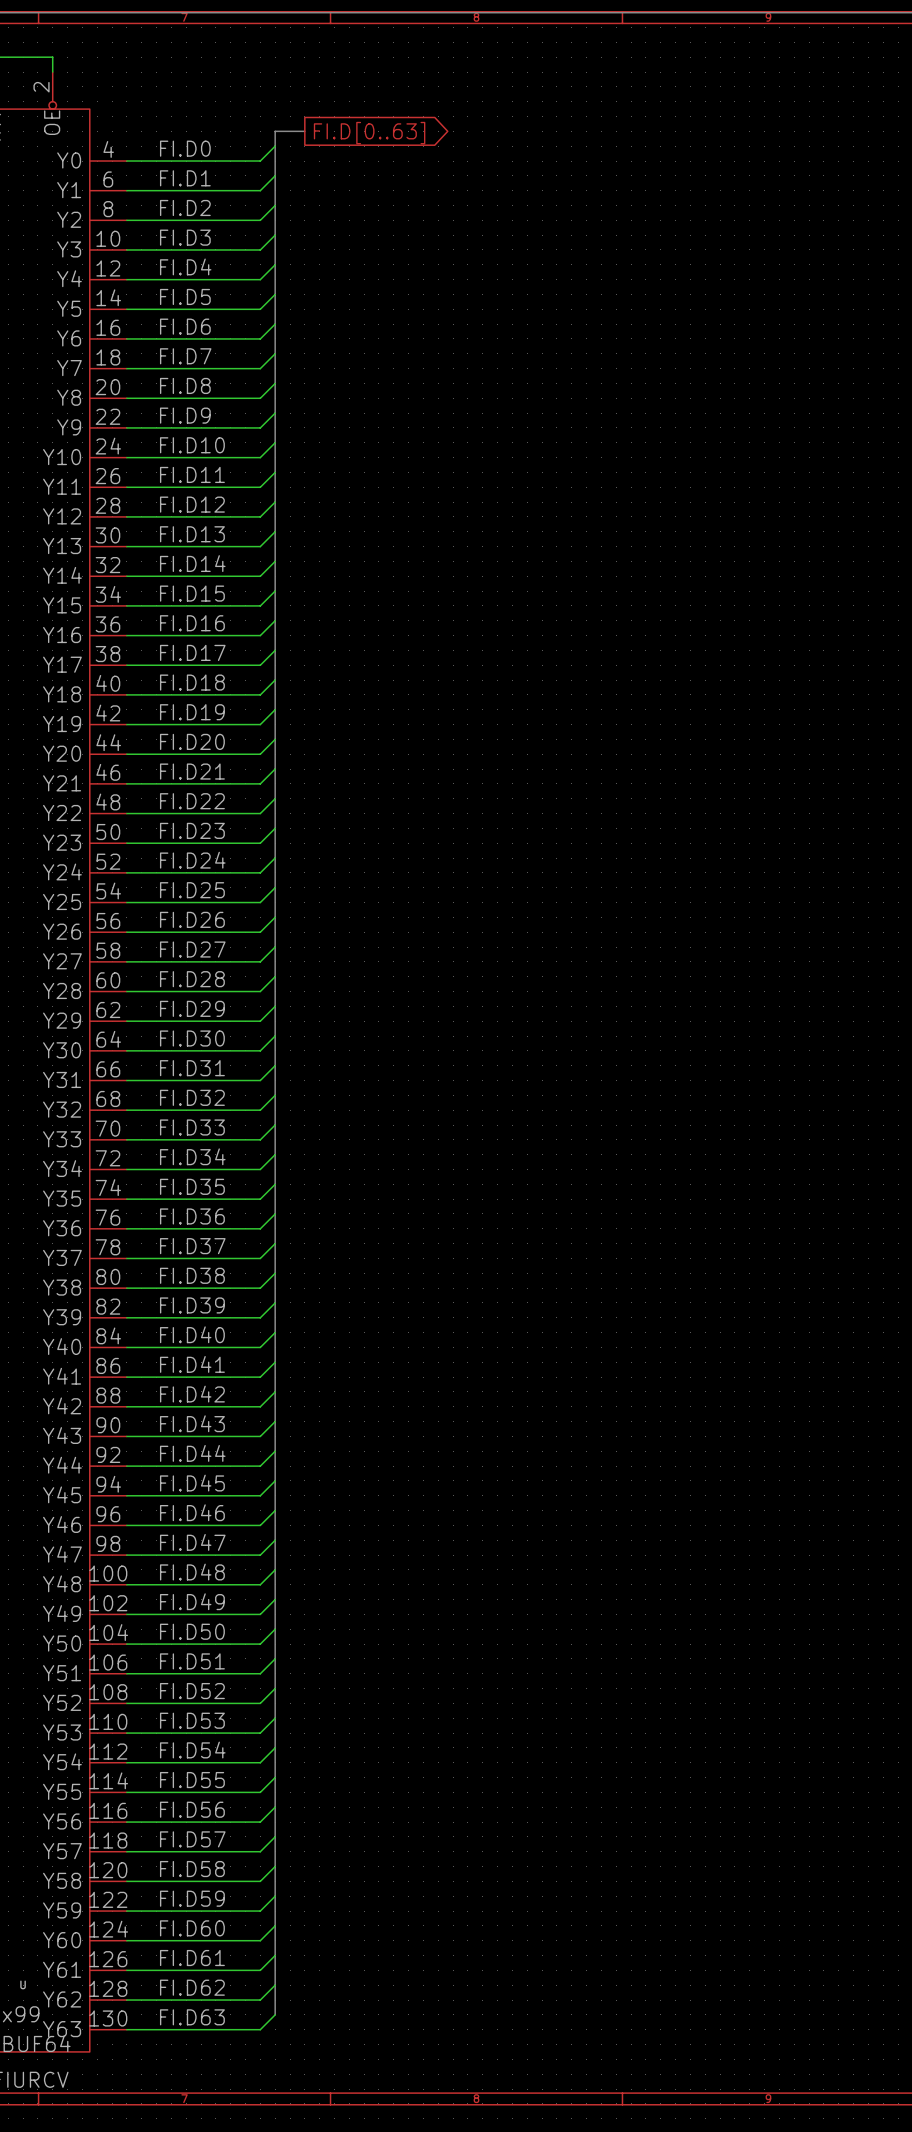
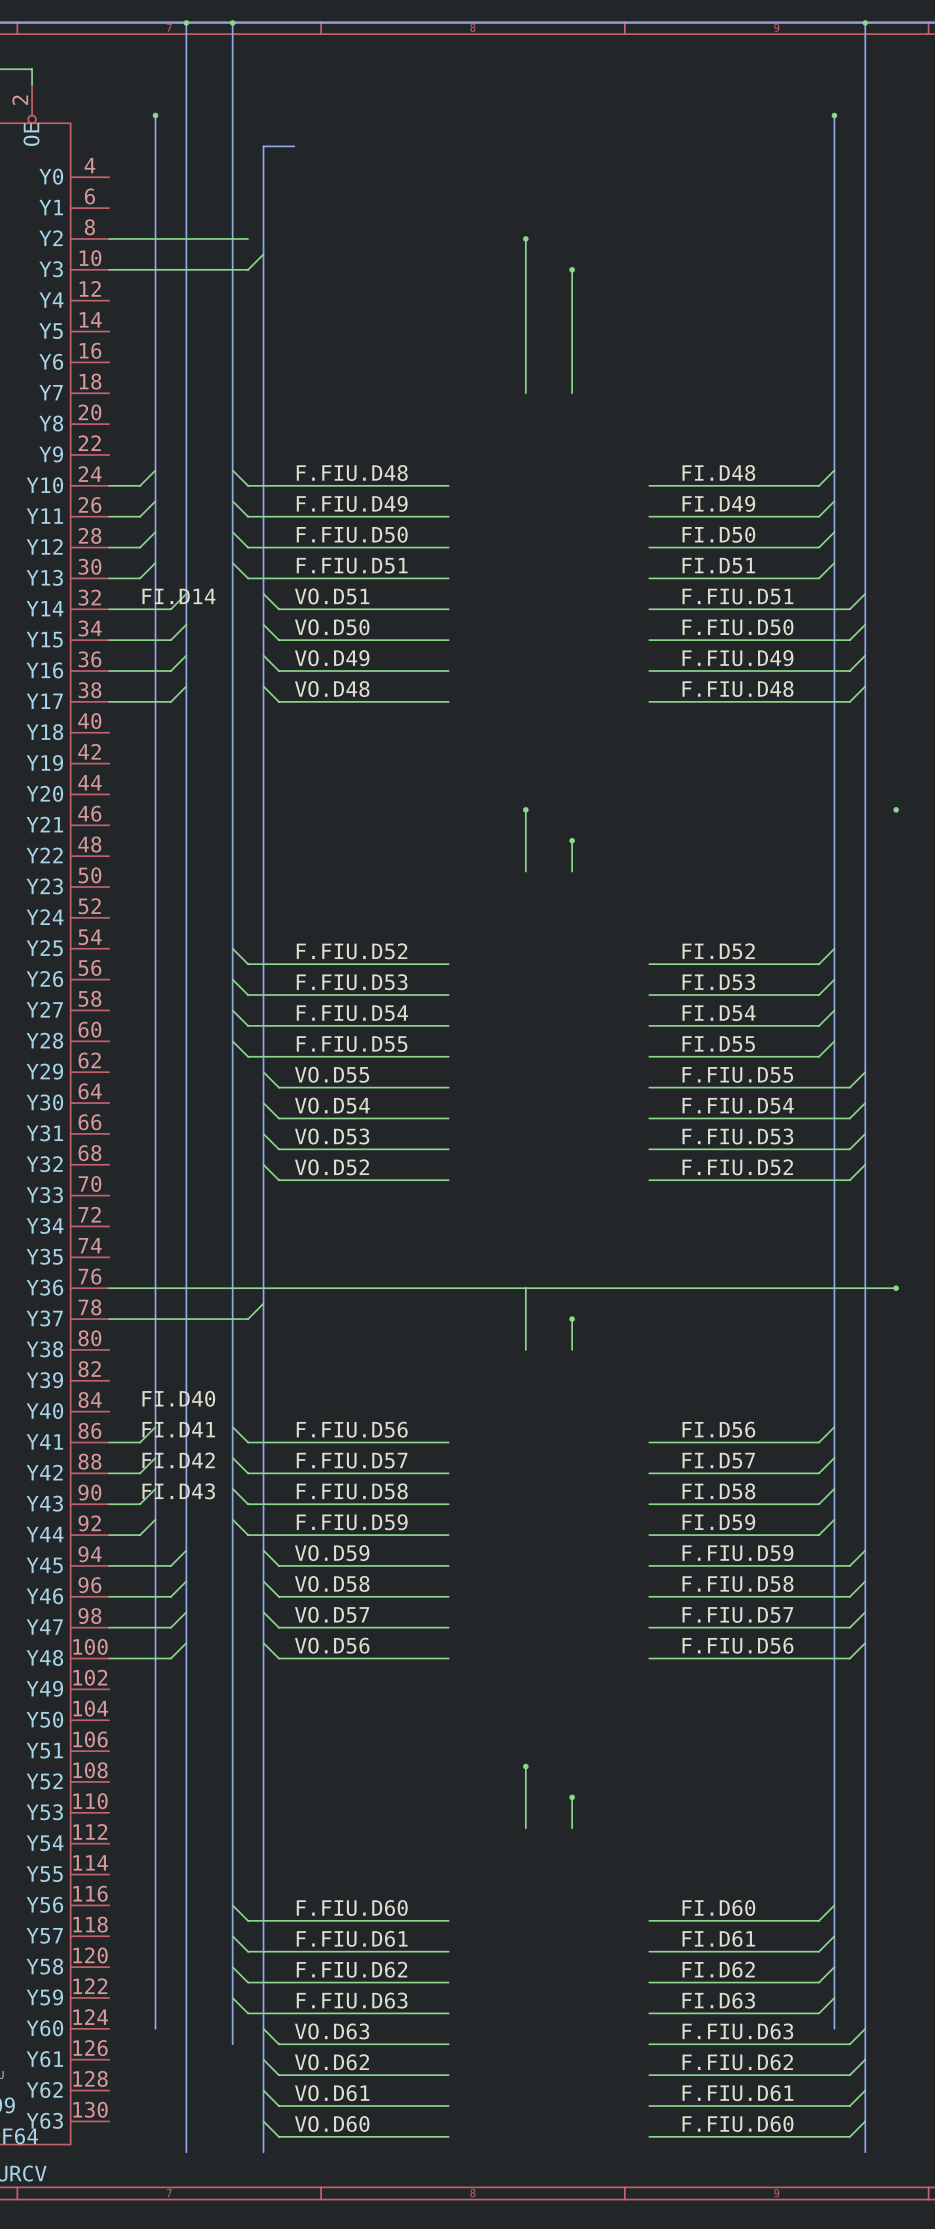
bus: none -> (186, 22) (186, 2152)
junction: none -> (186, 22)
bus: none -> (232, 22) (232, 2044)
junction: none -> (232, 22)
bus: none -> (865, 22) (865, 2152)
junction: none -> (865, 22)
bus: none -> (155, 115) (155, 2028)
junction: none -> (155, 115)
bus: none -> (834, 115) (834, 2028)
junction: none -> (834, 115)
global label: FI.D[0..63] (369, 133) -> none
wire: (275, 146) (260, 161) (126, 161) -> none
label: FI.D0 (185, 148) -> none
wire: (275, 175) (260, 190) (126, 190) -> none
label: FI.D1 (185, 178) -> none
wire: (275, 205) (260, 220) -> none
label: FI.D2 (185, 207) -> none
wire: none -> (525, 238) (525, 393)
junction: none -> (525, 238)
label: FI.D3 (185, 237) -> none
wire: none -> (572, 269) (572, 393)
junction: none -> (572, 269)
wire: (275, 264) (260, 279) (126, 279) -> none
label: FI.D4 (185, 266) -> none
wire: (275, 294) (260, 309) (126, 309) -> none
label: FI.D5 (185, 296) -> none
wire: (275, 324) (260, 338) (126, 338) -> none
label: FI.D6 (185, 326) -> none
wire: (275, 353) (260, 368) (126, 368) -> none
label: FI.D7 (185, 356) -> none
wire: (275, 383) (260, 398) (126, 398) -> none
label: FI.D8 (185, 385) -> none
wire: (275, 413) (260, 427) (126, 427) -> none
label: FI.D9 (185, 415) -> none
wire: none -> (232, 470) (248, 485) (448, 485)
wire: (275, 442) (260, 457) (156, 457) -> (155, 470) (140, 485)
wire: none -> (834, 470) (819, 485) (649, 485)
label: none -> F.FIU.D48 (352, 473)
label: none -> FI.D48 (718, 473)
label: FI.D10 (192, 445) -> none
wire: none -> (232, 501) (248, 516) (448, 516)
wire: (275, 472) (260, 487) (156, 487) -> (155, 501) (140, 516)
wire: none -> (834, 501) (819, 516) (649, 516)
label: FI.D11 (192, 474) -> none
label: none -> F.FIU.D49 (352, 503)
label: none -> FI.D49 (718, 503)
wire: none -> (232, 532) (248, 547) (448, 547)
wire: (275, 502) (260, 516) (156, 516) -> (155, 532) (140, 547)
wire: none -> (834, 532) (819, 547) (649, 547)
label: FI.D12 (192, 504) -> none
label: none -> F.FIU.D50 (352, 534)
label: none -> FI.D50 (718, 534)
wire: none -> (232, 562) (248, 578) (448, 578)
wire: (275, 531) (260, 546) (156, 546) -> (155, 562) (140, 578)
wire: none -> (834, 562) (819, 578) (649, 578)
label: FI.D13 (192, 534) -> none
label: none -> F.FIU.D51 (352, 565)
label: none -> FI.D51 (718, 565)
wire: (275, 561) (260, 576) (186, 576) -> (186, 593) (170, 609)
wire: none -> (263, 593) (278, 609) (448, 609)
wire: none -> (865, 593) (849, 609) (649, 609)
label: none -> VO.D51 (332, 596)
label: none -> F.FIU.D51 (737, 596)
wire: (275, 591) (260, 605) (186, 605) -> (186, 624) (170, 640)
wire: none -> (263, 624) (278, 640) (448, 640)
wire: none -> (865, 624) (849, 640) (649, 640)
label: FI.D15 (192, 593) -> none
label: none -> VO.D50 (332, 627)
label: none -> F.FIU.D50 (737, 627)
wire: (275, 620) (260, 635) (186, 635) -> (186, 655) (170, 671)
wire: none -> (263, 655) (278, 671) (448, 671)
wire: none -> (865, 655) (849, 671) (649, 671)
label: none -> VO.D49 (332, 658)
label: none -> F.FIU.D49 (737, 658)
label: FI.D16 (192, 623) -> none
wire: (275, 650) (260, 665) (186, 665) -> (186, 686) (170, 701)
wire: none -> (263, 686) (278, 701) (448, 701)
wire: none -> (865, 686) (849, 701) (649, 701)
label: FI.D17 (192, 652) -> none
label: none -> VO.D48 (332, 689)
label: none -> F.FIU.D48 (738, 689)
wire: (275, 680) (260, 694) (126, 694) -> none
label: FI.D18 (192, 682) -> none
wire: (275, 709) (260, 724) (126, 724) -> none
label: FI.D19 (192, 712) -> none
wire: (275, 739) (260, 754) (126, 754) -> none
label: FI.D20 (192, 741) -> none
wire: (275, 769) (260, 783) (126, 783) -> none
wire: none -> (525, 809) (525, 871)
junction: none -> (525, 809)
junction: none -> (896, 809)
label: FI.D21 (192, 771) -> none
wire: (275, 798) (260, 813) (126, 813) -> none
wire: none -> (572, 840) (572, 871)
junction: none -> (572, 840)
label: FI.D22 (192, 801) -> none
wire: (275, 828) (260, 843) (126, 843) -> none
label: FI.D23 (192, 830) -> none
wire: (275, 858) (260, 872) (126, 872) -> none
label: FI.D24 (192, 860) -> none
wire: (275, 887) (260, 902) (126, 902) -> none
label: FI.D25 (192, 890) -> none
wire: none -> (232, 948) (248, 964) (448, 964)
wire: none -> (834, 948) (819, 964) (649, 964)
label: none -> F.FIU.D52 (352, 951)
label: none -> FI.D52 (718, 951)
wire: (275, 917) (260, 932) (126, 932) -> none
label: FI.D26 (192, 919) -> none
wire: none -> (232, 979) (248, 995) (448, 995)
wire: none -> (834, 979) (819, 995) (649, 995)
label: none -> F.FIU.D53 (352, 982)
label: none -> FI.D53 (718, 982)
wire: (275, 947) (260, 961) (126, 961) -> none
label: FI.D27 (192, 949) -> none
wire: none -> (232, 1010) (248, 1025) (448, 1025)
wire: none -> (834, 1010) (819, 1025) (649, 1025)
label: none -> F.FIU.D54 (352, 1013)
label: none -> FI.D54 (719, 1013)
wire: (275, 976) (260, 991) (126, 991) -> none
label: FI.D28 (192, 979) -> none
wire: none -> (232, 1041) (248, 1056) (448, 1056)
wire: none -> (834, 1041) (819, 1056) (649, 1056)
label: none -> F.FIU.D55 (352, 1044)
label: none -> FI.D55 (718, 1044)
wire: (275, 1006) (260, 1021) (126, 1021) -> none
label: FI.D29 (192, 1008) -> none
wire: none -> (263, 1072) (278, 1087) (448, 1087)
wire: none -> (865, 1072) (849, 1087) (649, 1087)
label: none -> VO.D55 (332, 1074)
label: none -> F.FIU.D55 (737, 1074)
wire: (275, 1036) (260, 1050) (126, 1050) -> none
label: FI.D30 (192, 1038) -> none
wire: none -> (263, 1103) (278, 1118) (448, 1118)
wire: none -> (865, 1103) (849, 1118) (649, 1118)
label: none -> VO.D54 (332, 1105)
label: none -> F.FIU.D54 (738, 1105)
wire: (275, 1065) (260, 1080) (126, 1080) -> none
label: FI.D31 (192, 1068) -> none
wire: none -> (263, 1133) (278, 1149) (448, 1149)
wire: none -> (865, 1133) (849, 1149) (649, 1149)
label: none -> VO.D53 (332, 1136)
label: none -> F.FIU.D53 (737, 1136)
wire: (275, 1095) (260, 1110) (126, 1110) -> none
label: FI.D32 (192, 1097) -> none
wire: none -> (263, 1164) (278, 1180) (448, 1180)
wire: none -> (865, 1164) (849, 1180) (649, 1180)
label: none -> VO.D52 (332, 1167)
label: none -> F.FIU.D52 (737, 1167)
wire: (275, 1125) (260, 1139) (126, 1139) -> none
label: FI.D33 (192, 1127) -> none
wire: (275, 1154) (260, 1169) (126, 1169) -> none
label: FI.D34 (192, 1156) -> none
wire: (275, 1184) (260, 1199) (126, 1199) -> none
label: FI.D35 (192, 1186) -> none
wire: (275, 1213) (260, 1228) -> (896, 1288) (248, 1288)
label: FI.D36 (192, 1216) -> none
wire: none -> (525, 1288) (525, 1349)
junction: none -> (896, 1288)
label: FI.D37 (192, 1246) -> none
wire: none -> (572, 1319) (572, 1349)
junction: none -> (572, 1319)
wire: (275, 1273) (260, 1288) (126, 1288) -> none
label: FI.D38 (192, 1275) -> none
wire: (275, 1302) (260, 1317) (126, 1317) -> none
label: FI.D39 (192, 1305) -> none
wire: (275, 1332) (260, 1347) (126, 1347) -> none
wire: none -> (232, 1427) (248, 1442) (448, 1442)
wire: (275, 1362) (260, 1377) (156, 1377) -> (155, 1427) (140, 1442)
wire: none -> (834, 1427) (819, 1442) (649, 1442)
label: none -> F.FIU.D56 (352, 1429)
label: none -> FI.D56 (718, 1429)
wire: none -> (232, 1457) (248, 1473) (448, 1473)
wire: (275, 1391) (260, 1406) (156, 1406) -> (155, 1457) (140, 1473)
wire: none -> (834, 1457) (819, 1473) (649, 1473)
label: none -> F.FIU.D57 (352, 1460)
label: none -> FI.D57 (718, 1460)
wire: none -> (232, 1488) (248, 1504) (448, 1504)
wire: (275, 1421) (260, 1436) (156, 1436) -> (155, 1488) (140, 1504)
wire: none -> (834, 1488) (819, 1504) (649, 1504)
label: none -> F.FIU.D58 (352, 1491)
label: none -> FI.D58 (718, 1491)
wire: none -> (232, 1519) (248, 1535) (448, 1535)
wire: (275, 1451) (260, 1466) (156, 1466) -> (155, 1519) (140, 1535)
wire: none -> (834, 1519) (819, 1535) (649, 1535)
label: FI.D44 (192, 1453) -> none
label: none -> F.FIU.D59 (352, 1522)
label: none -> FI.D59 (718, 1522)
wire: (275, 1480) (260, 1495) (186, 1495) -> (186, 1550) (170, 1565)
wire: none -> (263, 1550) (278, 1565) (448, 1565)
wire: none -> (865, 1550) (849, 1565) (649, 1565)
label: FI.D45 (192, 1483) -> none
label: none -> VO.D59 (332, 1553)
label: none -> F.FIU.D59 (737, 1553)
wire: (275, 1510) (260, 1525) (186, 1525) -> (186, 1581) (170, 1596)
wire: none -> (263, 1581) (278, 1596) (448, 1596)
wire: none -> (865, 1581) (849, 1596) (649, 1596)
label: FI.D46 (192, 1512) -> none
label: none -> VO.D58 (332, 1583)
label: none -> F.FIU.D58 (738, 1583)
wire: (275, 1540) (260, 1555) (186, 1555) -> (186, 1612) (170, 1627)
wire: none -> (263, 1612) (278, 1627) (448, 1627)
wire: none -> (865, 1612) (849, 1627) (649, 1627)
label: FI.D47 (192, 1542) -> none
label: none -> VO.D57 (332, 1614)
label: none -> F.FIU.D57 (737, 1614)
wire: (275, 1569) (260, 1584) (186, 1584) -> (186, 1643) (170, 1658)
wire: none -> (263, 1643) (278, 1658) (448, 1658)
wire: none -> (865, 1643) (849, 1658) (649, 1658)
label: FI.D48 (192, 1572) -> none
label: none -> VO.D56 (332, 1645)
label: none -> F.FIU.D56 (737, 1645)
wire: (275, 1599) (260, 1614) (126, 1614) -> none
label: FI.D49 (192, 1601) -> none
wire: (275, 1629) (260, 1644) (126, 1644) -> none
label: FI.D50 (192, 1631) -> none
wire: (275, 1658) (260, 1673) (126, 1673) -> none
label: FI.D51 (192, 1661) -> none
wire: (275, 1688) (260, 1703) (126, 1703) -> none
wire: none -> (525, 1766) (525, 1828)
junction: none -> (525, 1766)
label: FI.D52 (192, 1691) -> none
wire: (275, 1718) (260, 1733) (126, 1733) -> none
wire: none -> (572, 1797) (572, 1828)
junction: none -> (572, 1797)
label: FI.D53 (192, 1720) -> none
wire: (275, 1747) (260, 1762) (126, 1762) -> none
label: FI.D54 (192, 1750) -> none
wire: (275, 1777) (260, 1792) (126, 1792) -> none
label: FI.D55 (192, 1780) -> none
wire: (275, 1807) (260, 1822) (126, 1822) -> none
label: FI.D56 (192, 1809) -> none
wire: none -> (232, 1905) (248, 1920) (448, 1920)
wire: none -> (834, 1905) (819, 1920) (649, 1920)
label: none -> F.FIU.D60 (352, 1908)
label: none -> FI.D60 (718, 1908)
wire: (275, 1836) (260, 1851) (126, 1851) -> none
label: FI.D57 (192, 1839) -> none
wire: none -> (232, 1936) (248, 1951) (448, 1951)
wire: none -> (834, 1936) (819, 1951) (649, 1951)
label: none -> F.FIU.D61 (352, 1938)
label: none -> FI.D61 (718, 1938)
wire: (275, 1866) (260, 1881) (126, 1881) -> none
label: FI.D58 (192, 1869) -> none
wire: none -> (232, 1967) (248, 1982) (448, 1982)
wire: none -> (834, 1967) (819, 1982) (649, 1982)
label: none -> F.FIU.D62 (352, 1969)
label: none -> FI.D62 (718, 1969)
wire: (275, 1896) (260, 1911) (126, 1911) -> none
label: FI.D59 (192, 1898) -> none
wire: none -> (232, 1997) (248, 2013) (448, 2013)
wire: none -> (834, 1997) (819, 2013) (649, 2013)
label: none -> F.FIU.D63 (352, 2000)
label: none -> FI.D63 (718, 2000)
wire: (275, 1925) (260, 1940) (126, 1940) -> none
label: FI.D60 (192, 1928) -> none
wire: none -> (263, 2028) (278, 2044) (448, 2044)
wire: none -> (865, 2028) (849, 2044) (649, 2044)
label: none -> VO.D63 (332, 2031)
label: none -> F.FIU.D63 (737, 2031)
wire: (275, 1955) (260, 1970) (126, 1970) -> none
label: FI.D61 (192, 1958) -> none
wire: none -> (263, 2059) (278, 2075) (448, 2075)
wire: none -> (865, 2059) (849, 2075) (649, 2075)
label: none -> VO.D62 (332, 2062)
label: none -> F.FIU.D62 (737, 2062)
wire: (275, 1985) (260, 2000) (126, 2000) -> none
label: FI.D62 (192, 1987) -> none
wire: none -> (263, 2090) (278, 2105) (448, 2105)
wire: none -> (865, 2090) (849, 2105) (649, 2105)
label: none -> VO.D61 (332, 2093)
label: none -> F.FIU.D61 (737, 2093)
wire: (275, 2014) (260, 2029) (126, 2029) -> none
bus: none -> (263, 2105) (263, 2152)
label: FI.D63 (192, 2017) -> none
wire: none -> (263, 2121) (278, 2136) (448, 2136)
wire: none -> (865, 2121) (849, 2136) (649, 2136)
label: none -> VO.D60 (332, 2124)
label: none -> F.FIU.D60 (737, 2124)

